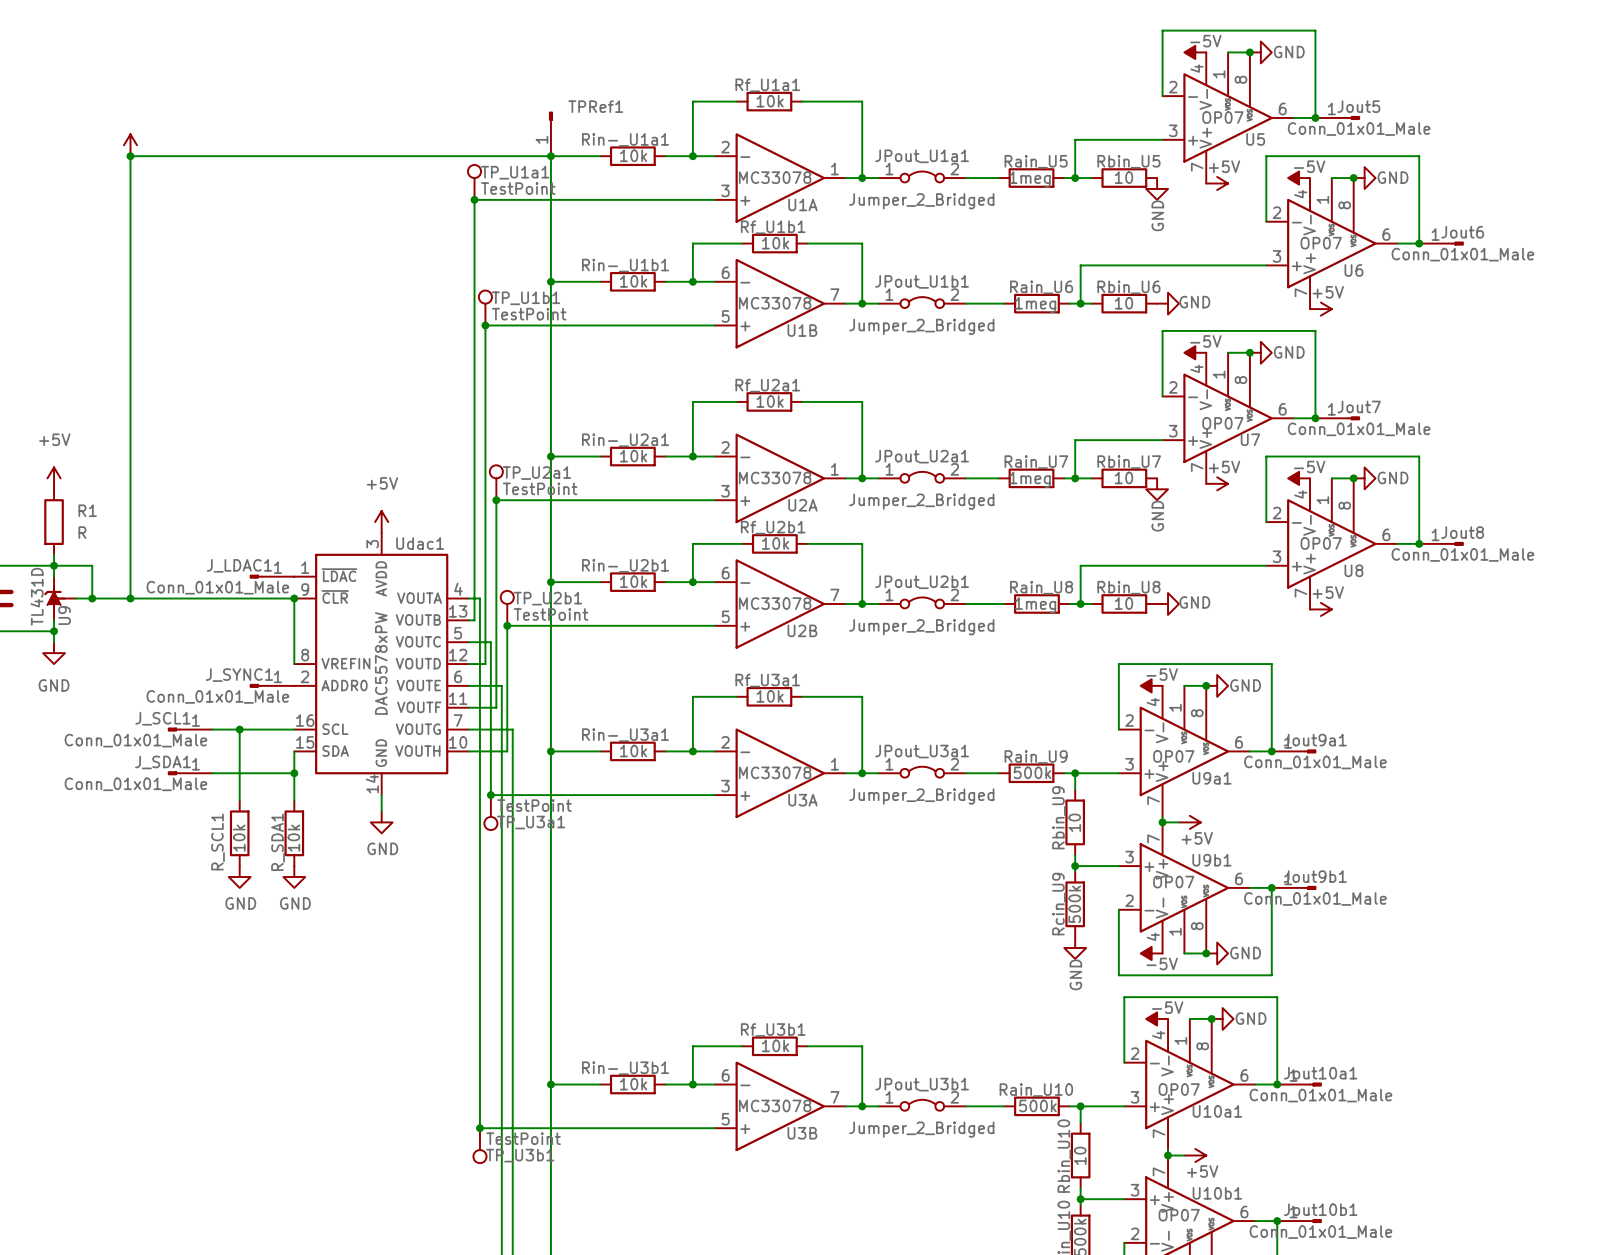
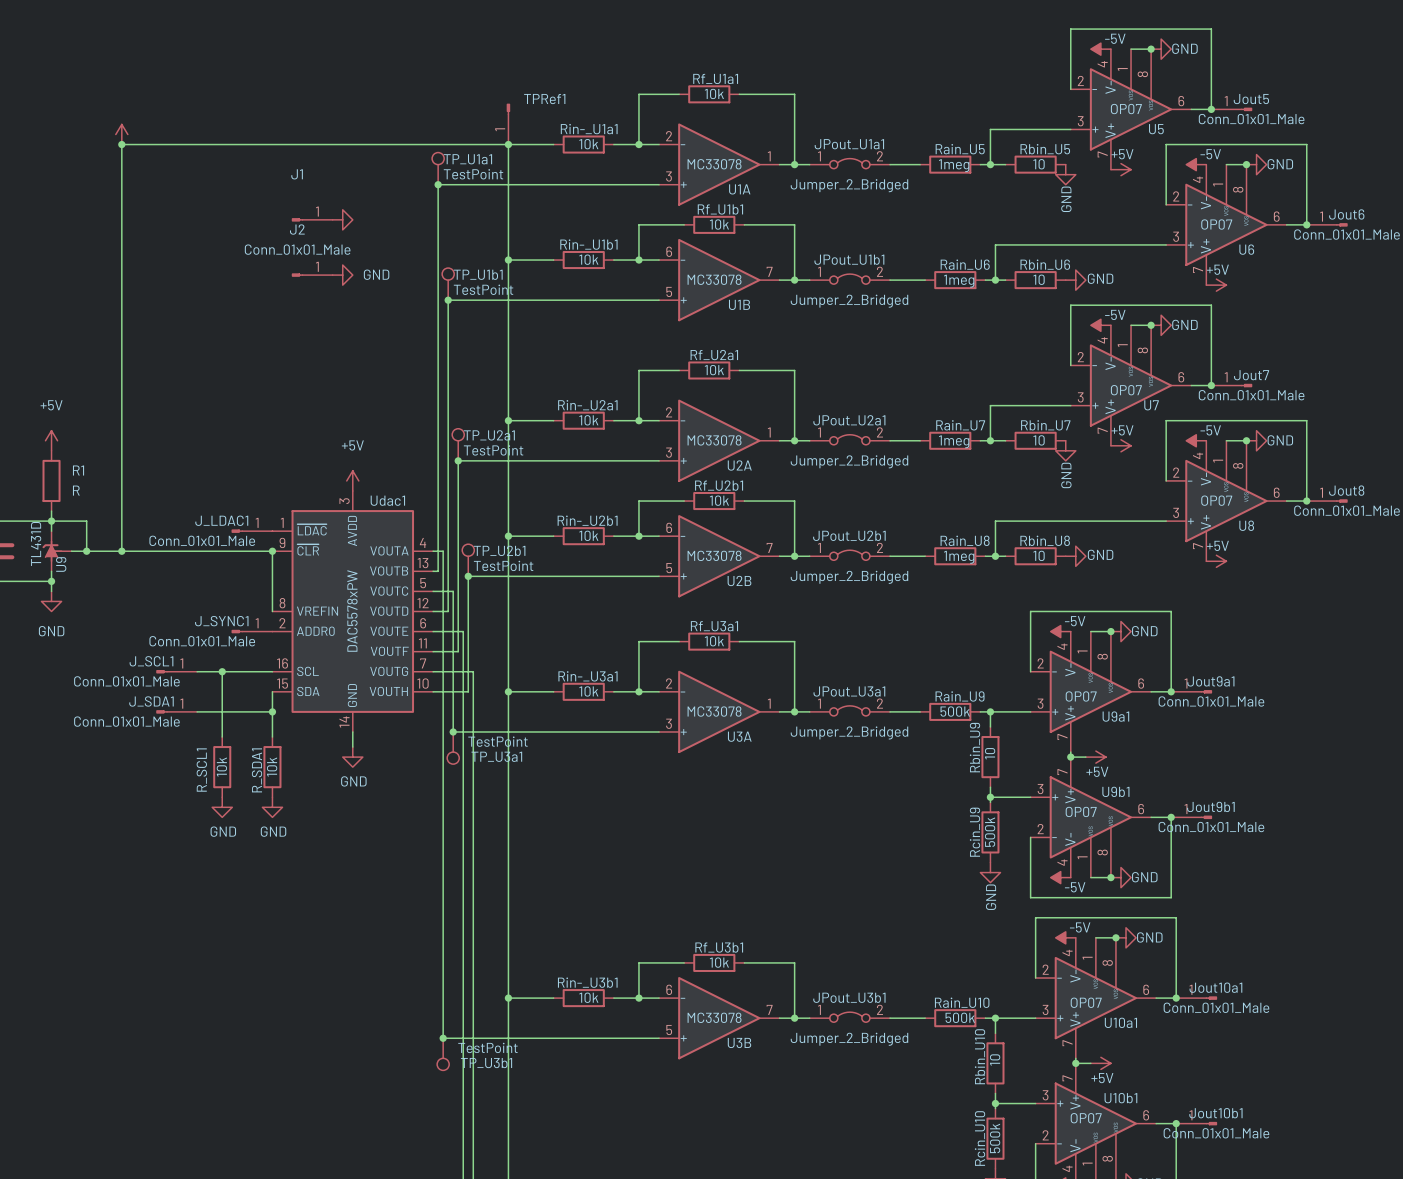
J1: none -> (312, 219)
power symbol: none -> (342, 219)
J2: none -> Conn_01x01_Male (312, 275)
power symbol: none -> GND (342, 275)

